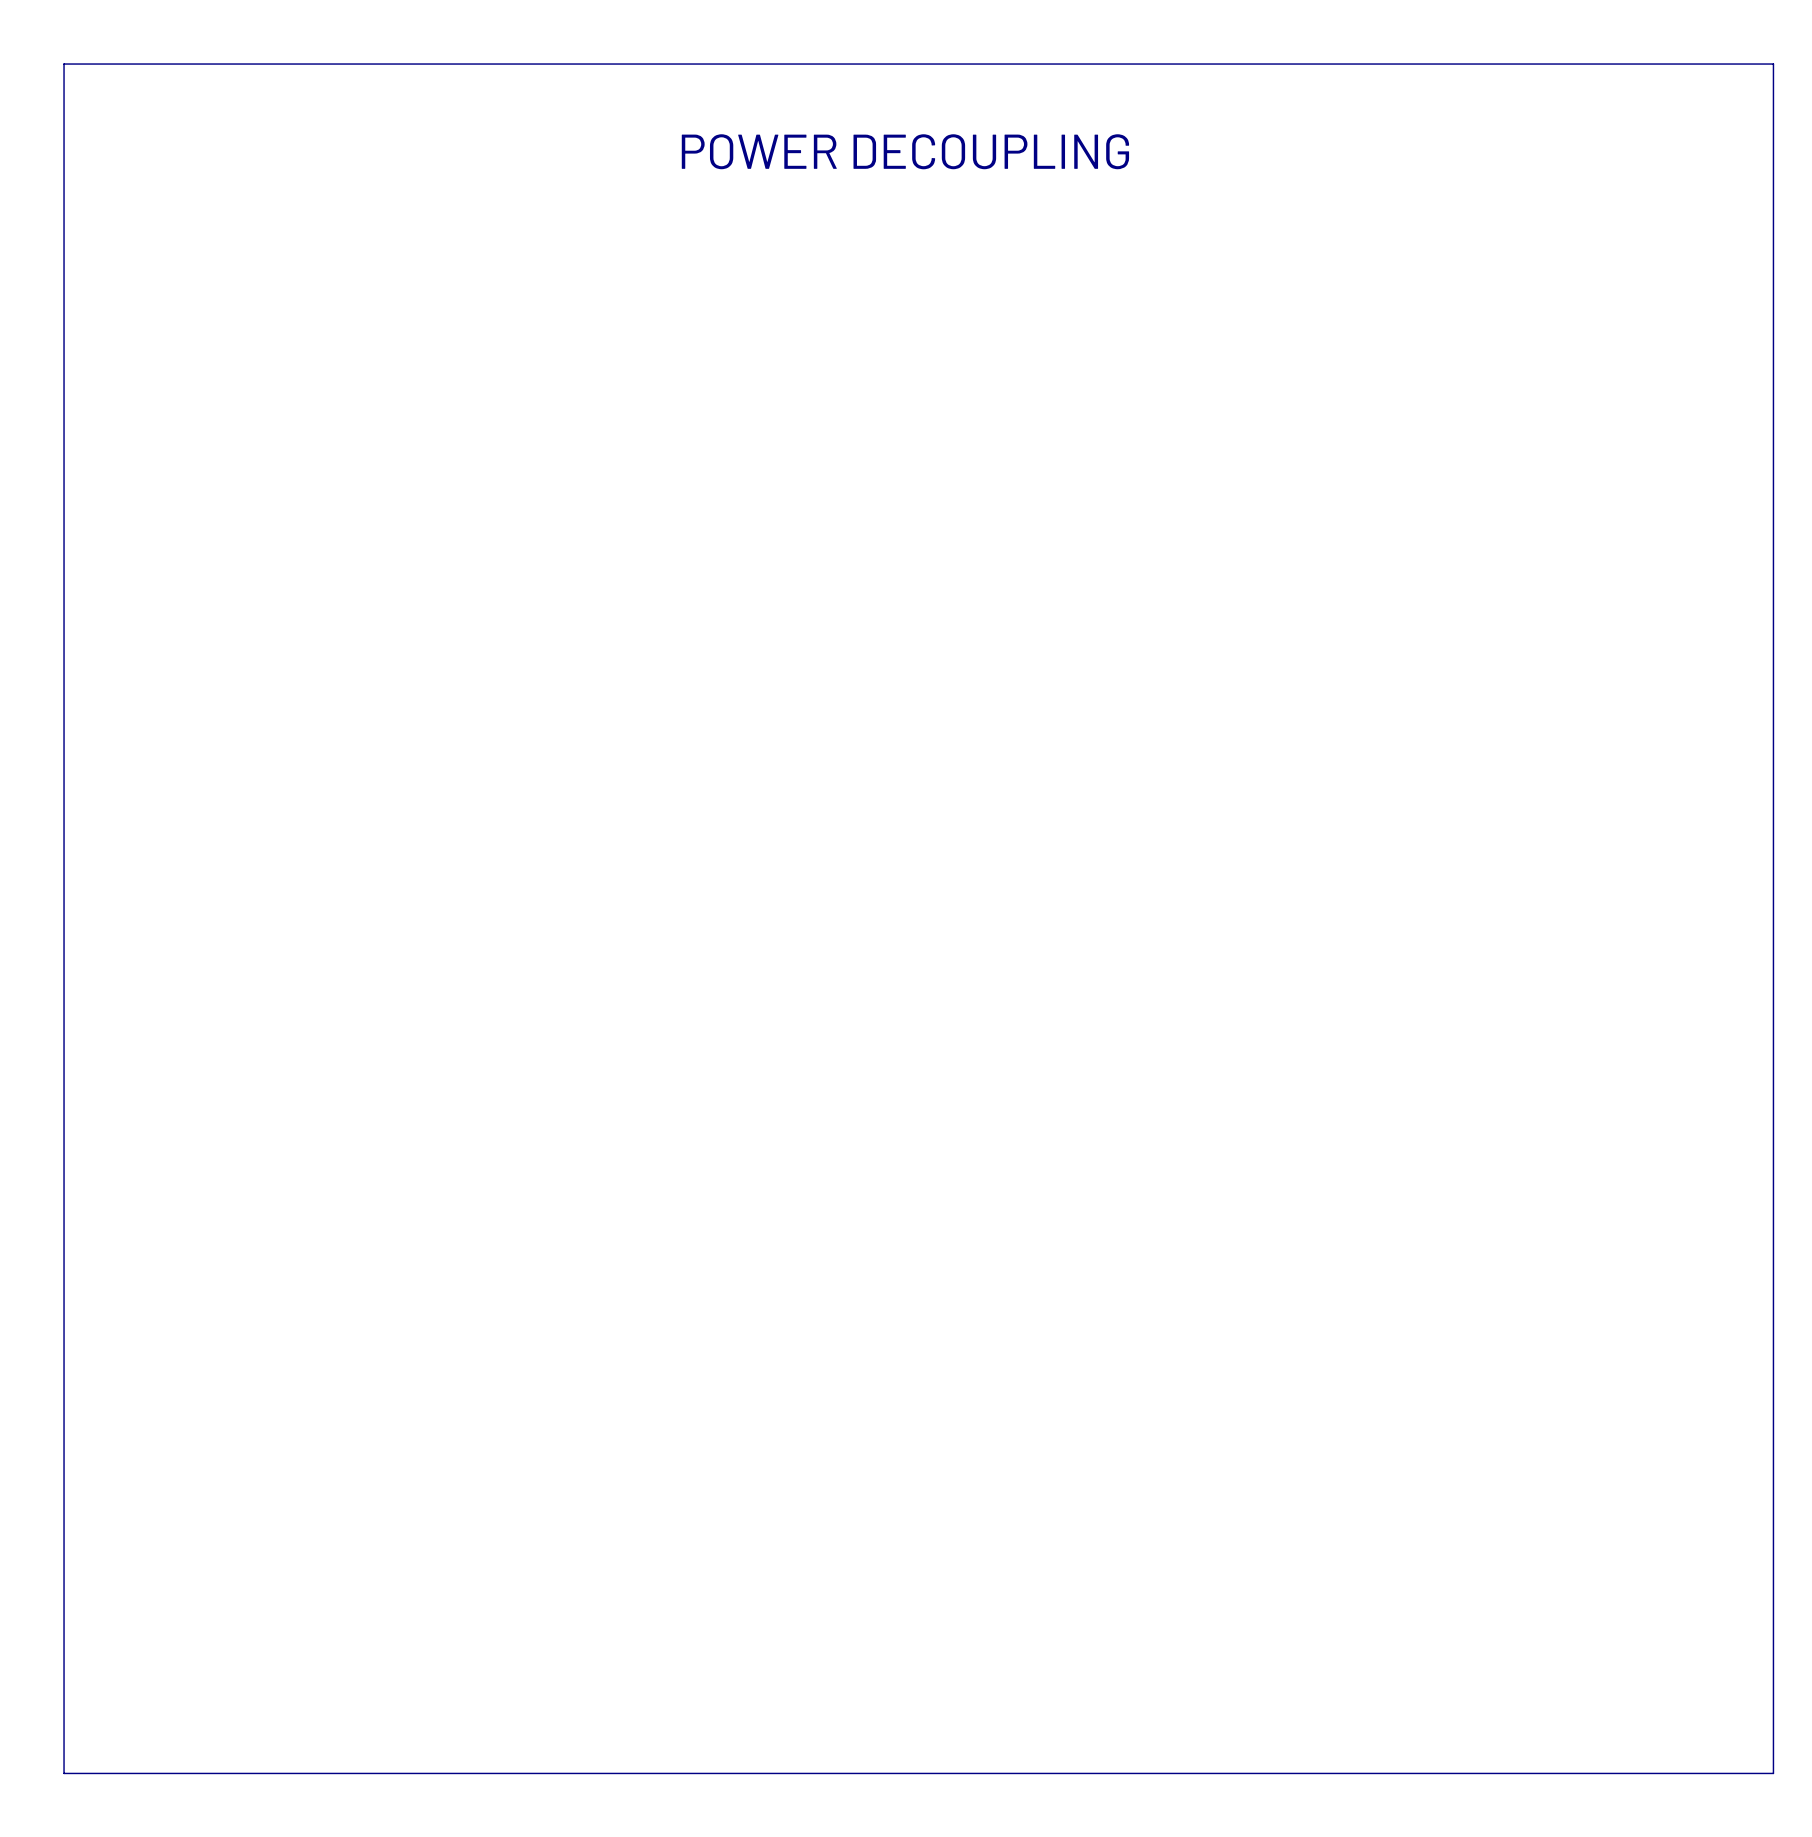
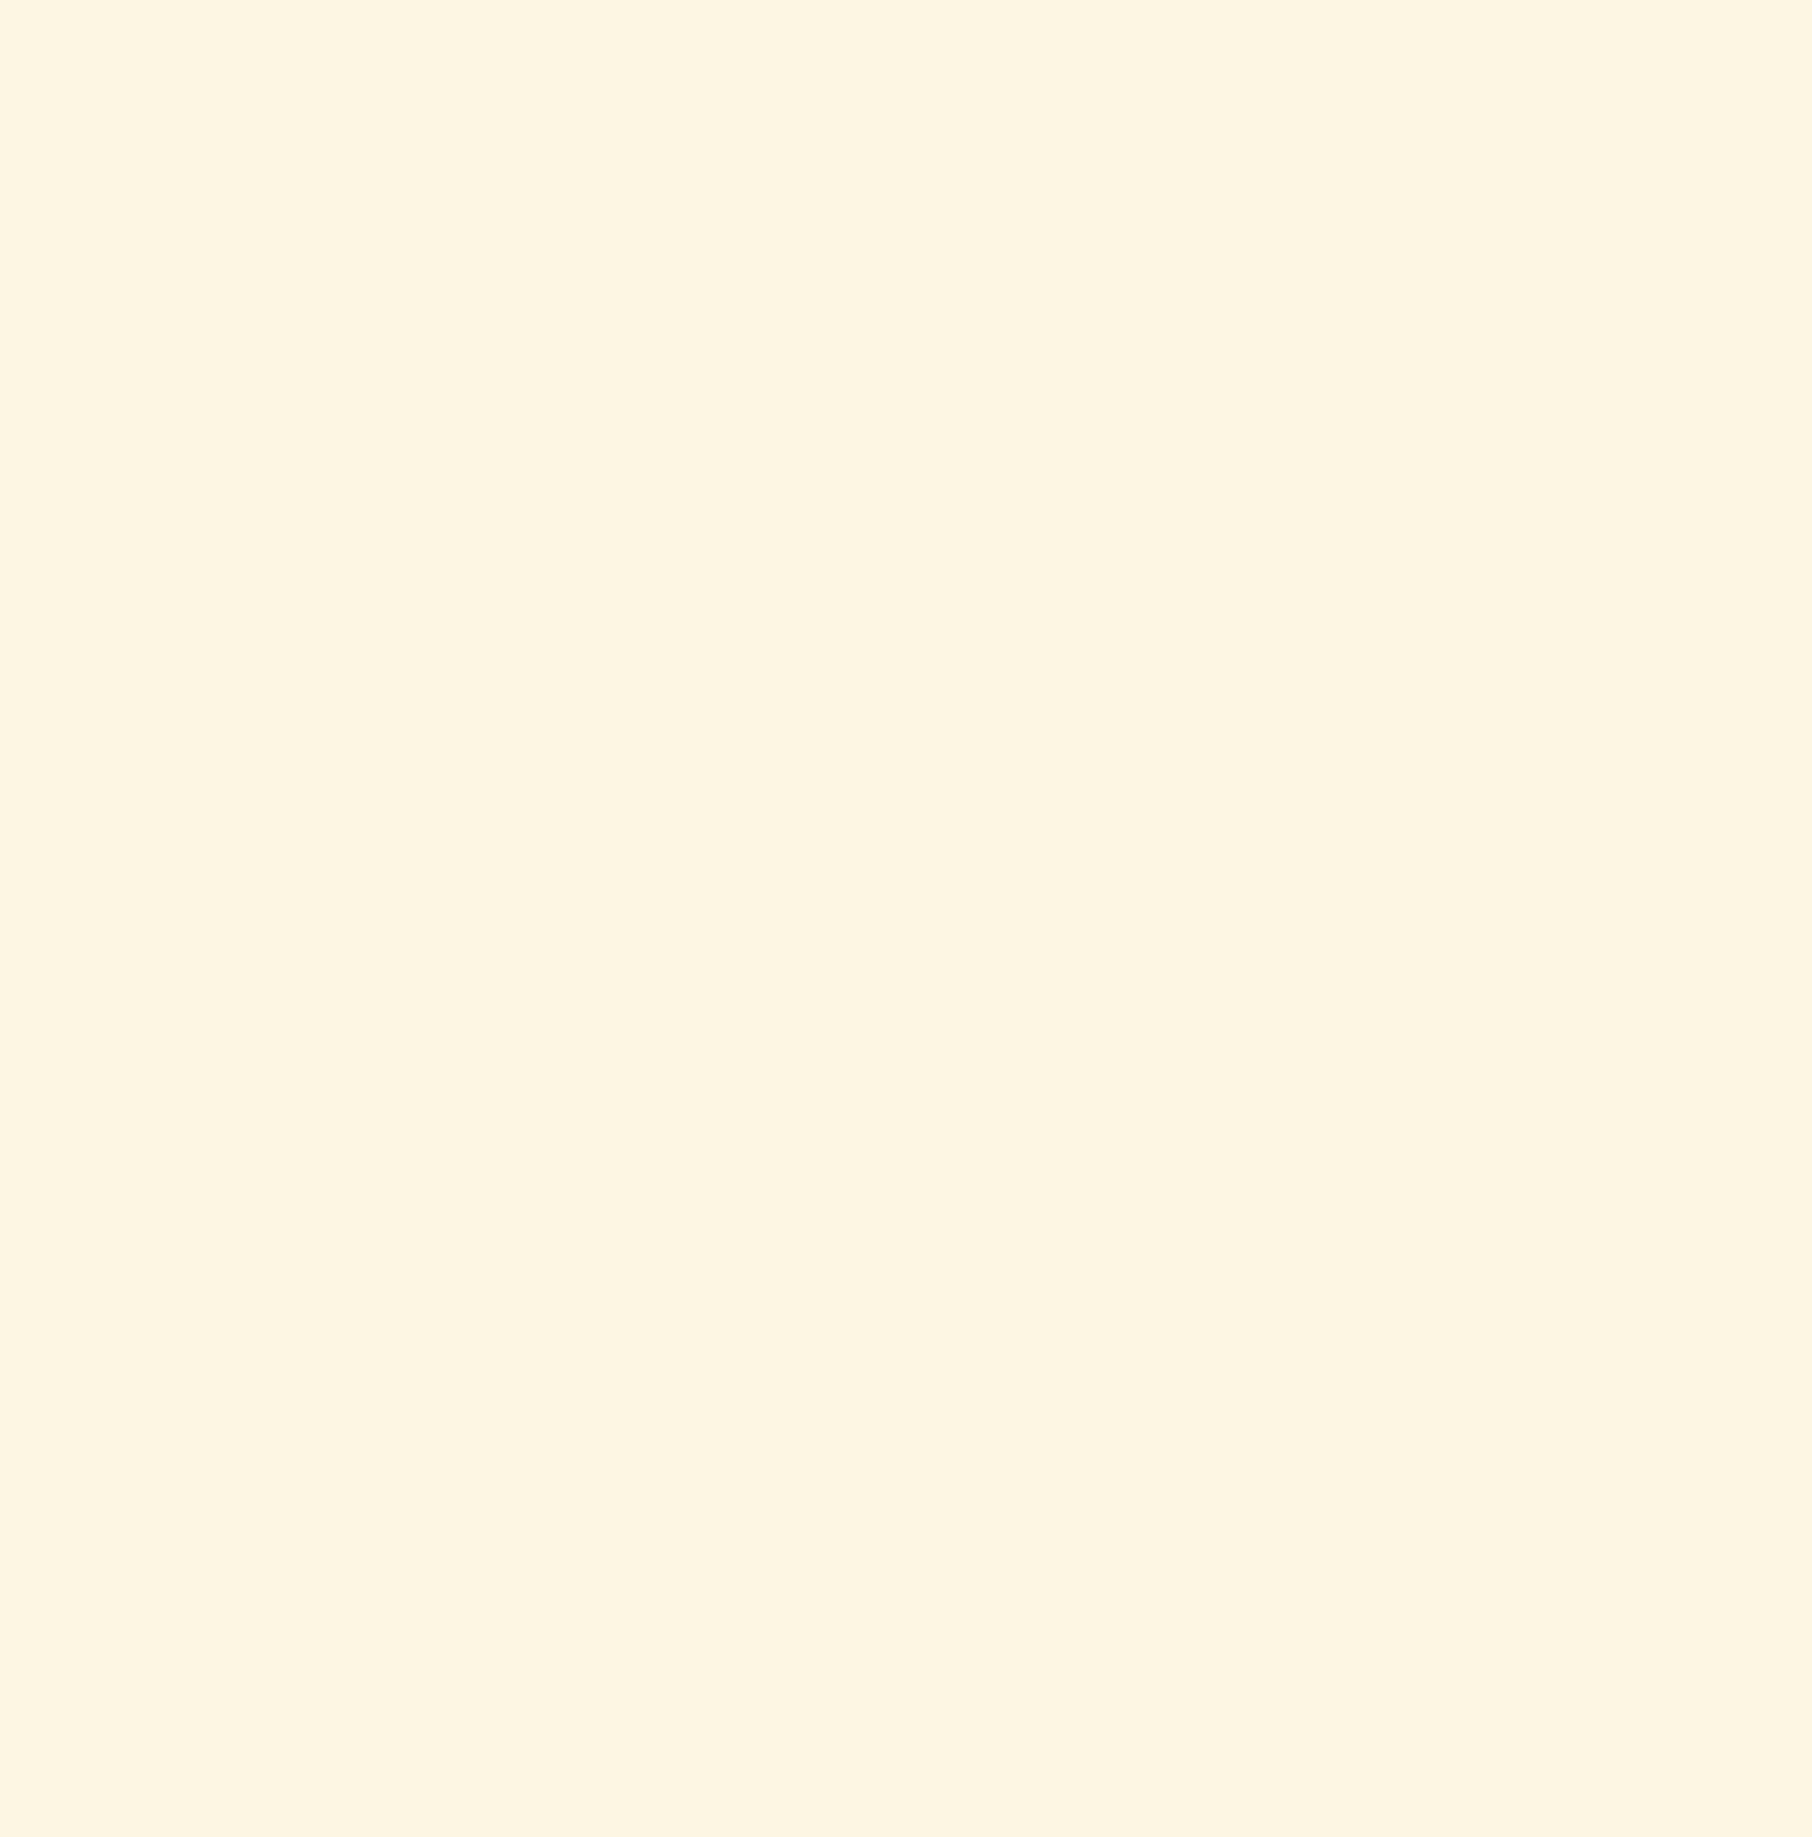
line: (64, 64) (1773, 64) (1773, 1773) (64, 1773) (64, 64) -> none
text: POWER DECOUPLING (905, 151) -> none

